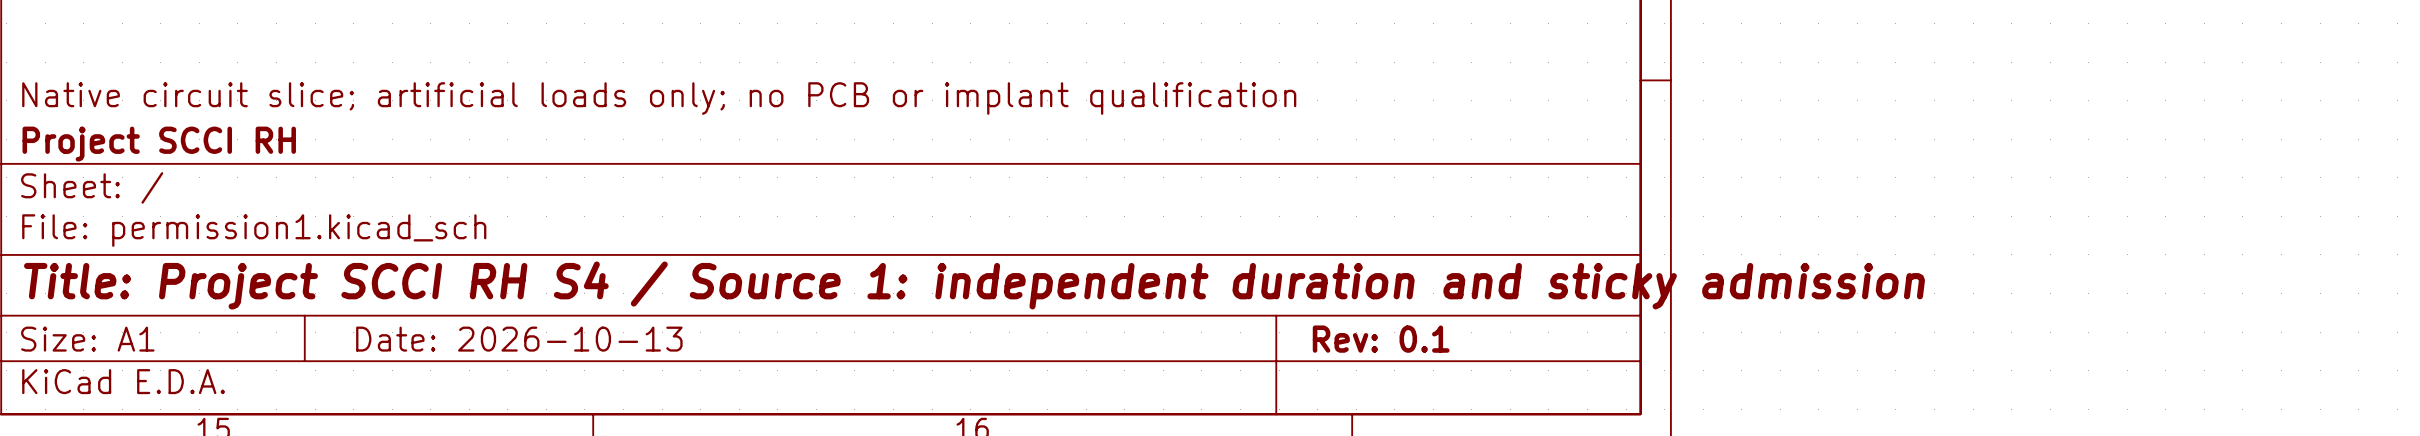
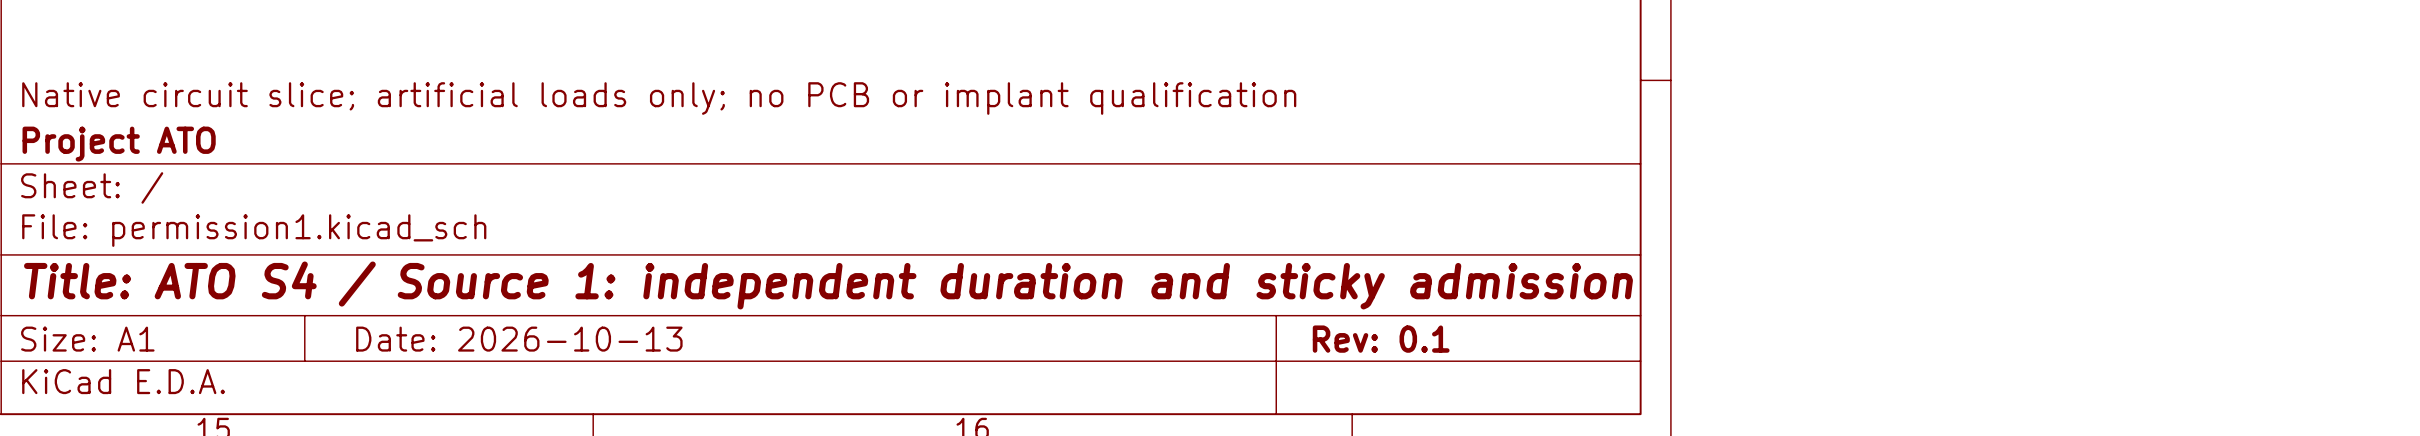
title block: Project SCCI RH (159, 144) -> Project ATO (119, 144)
title block: Title: Project SCCI RH S4 / Source 1: independent duration and sticky admission (974, 285) -> Title: ATO S4 / Source 1: independent duration and sticky admission (828, 285)

